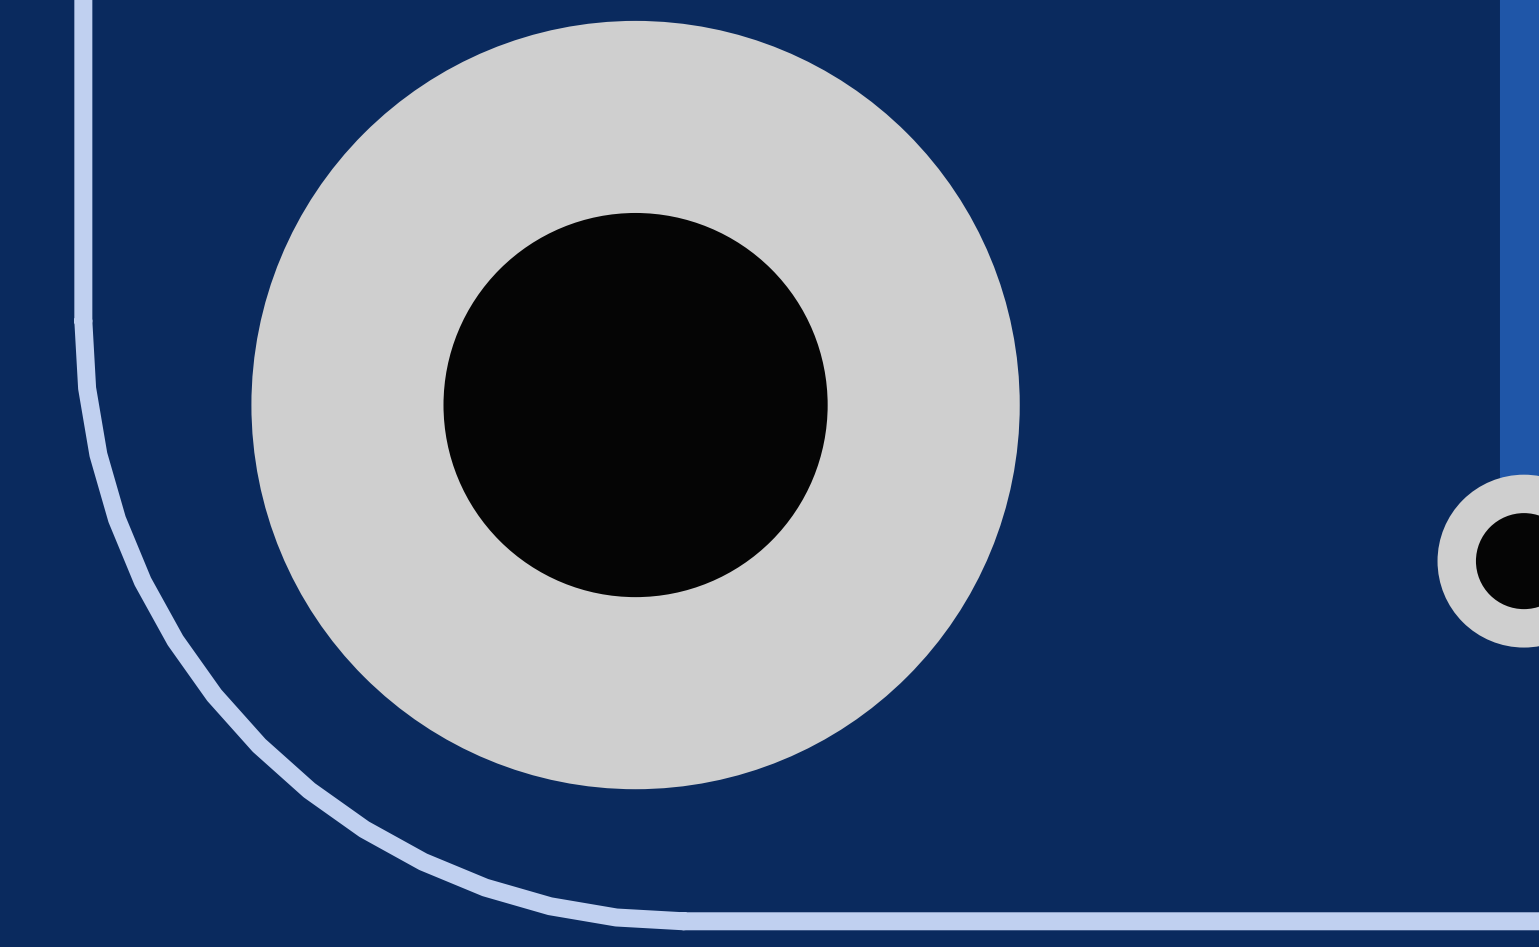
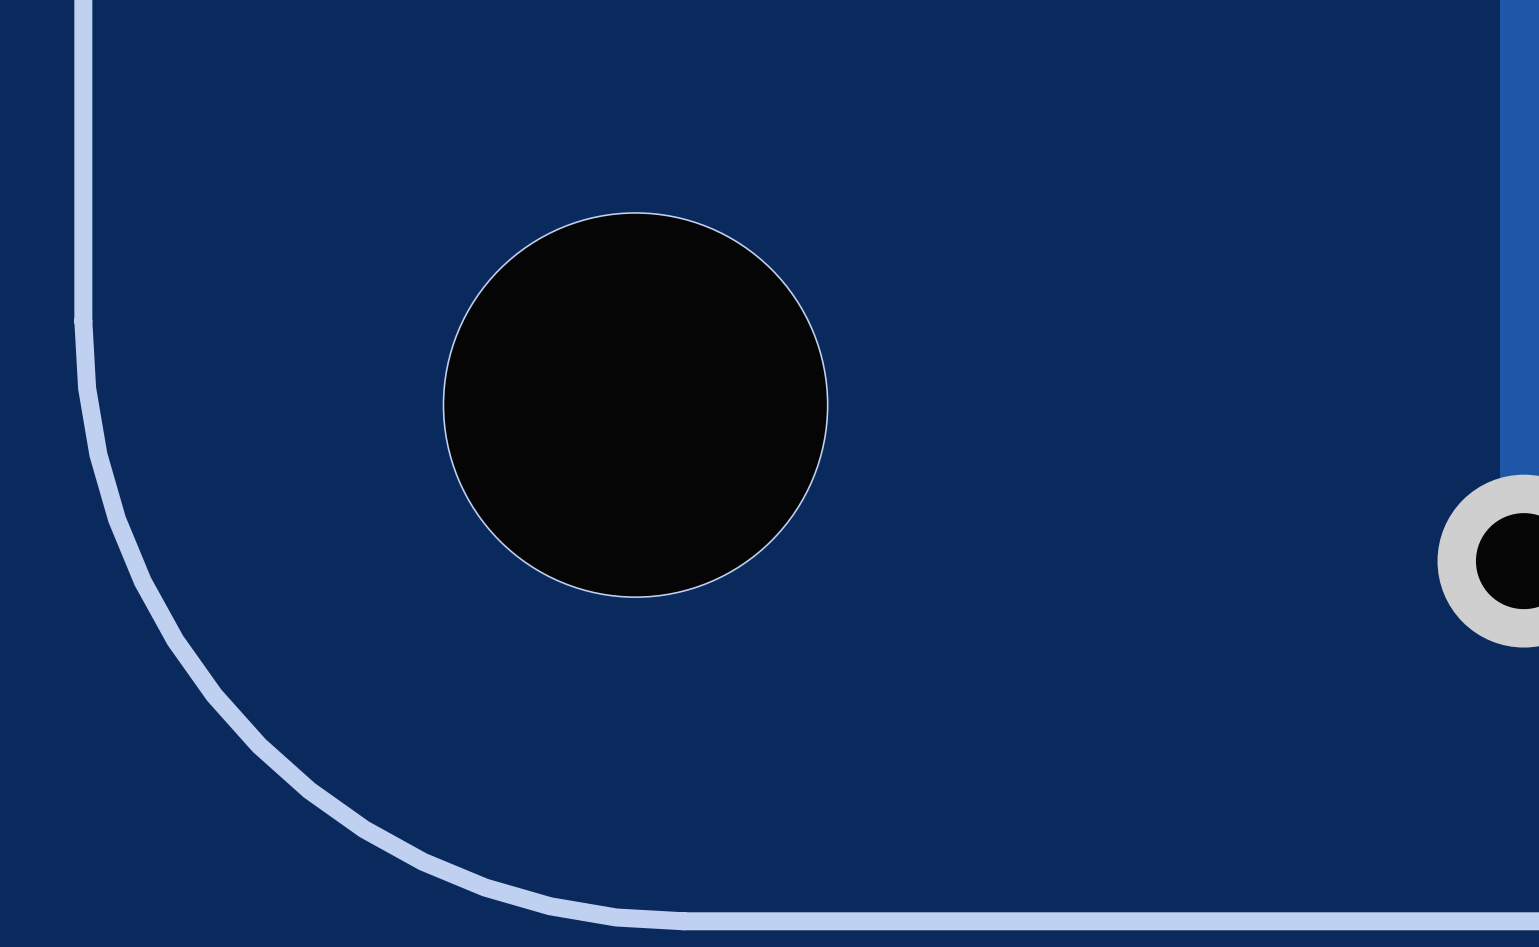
part footprint: [251, 20, 1020, 790] -> [443, 212, 828, 598]

